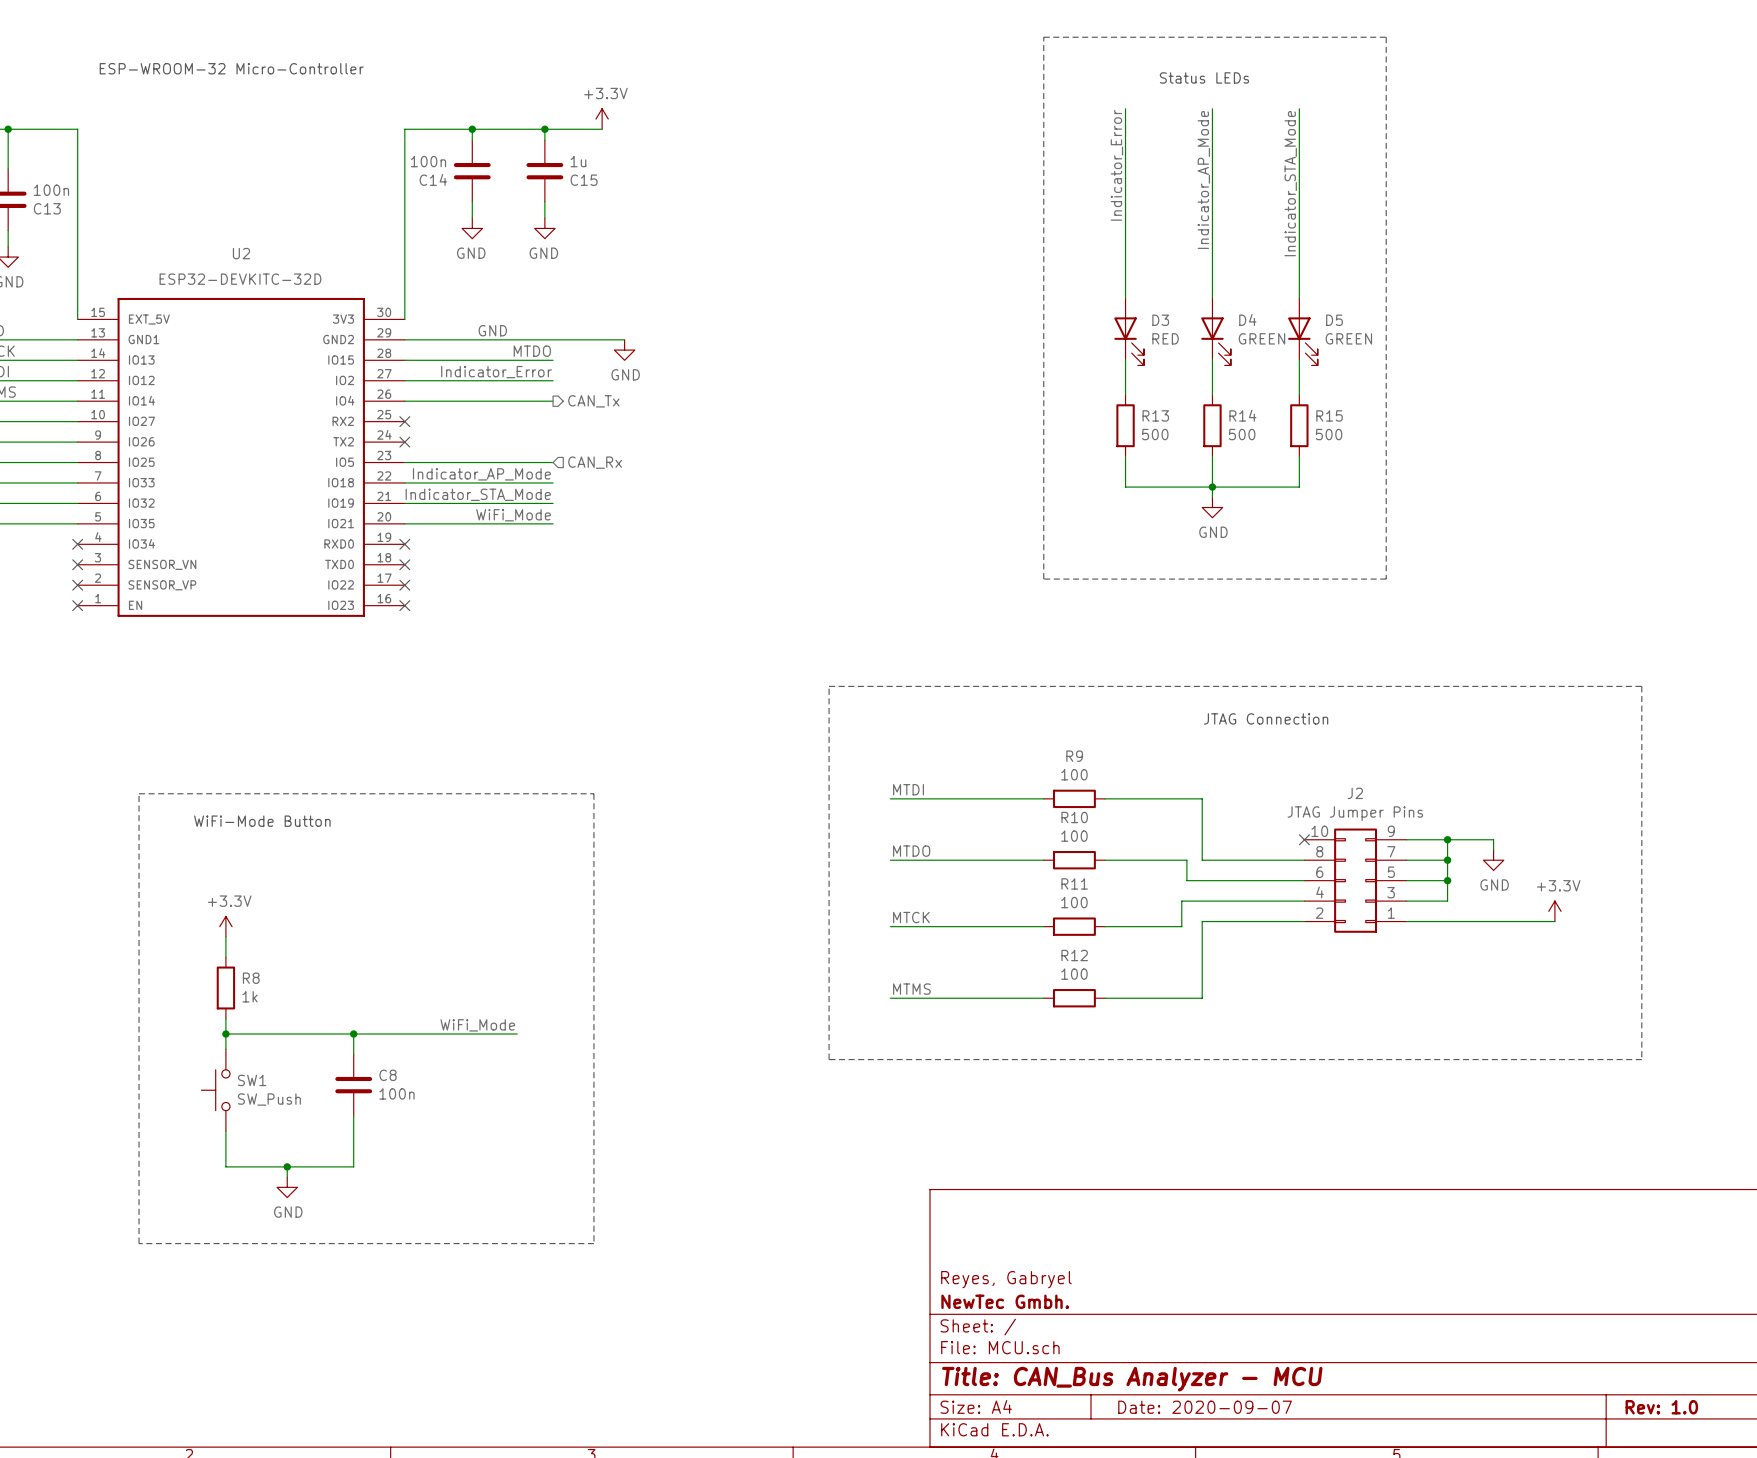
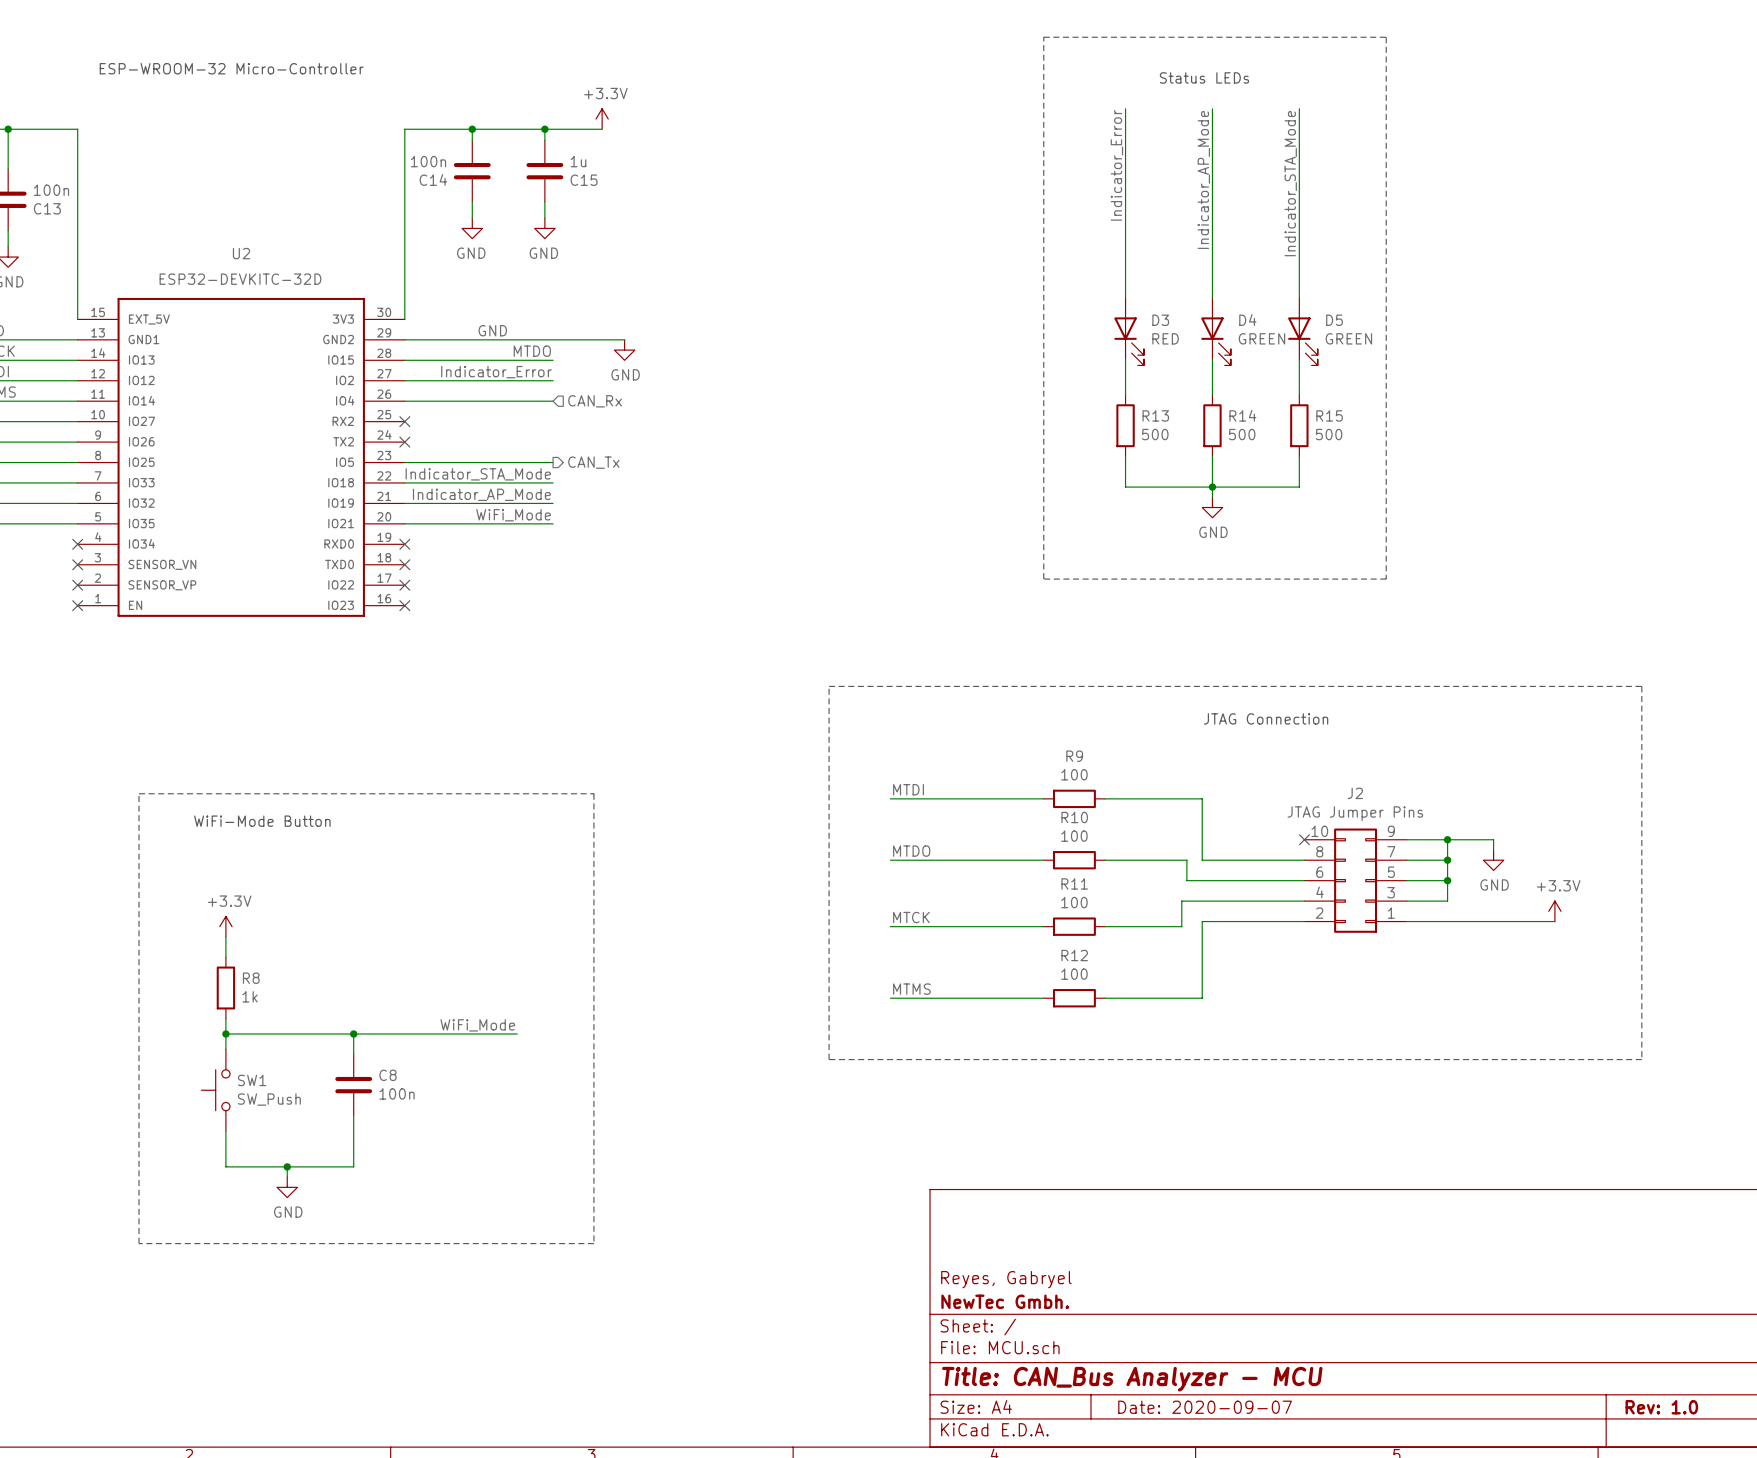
hierarchical label shape: output (593, 401) -> input (595, 401)
hierarchical label: CAN_Tx (593, 401) -> CAN_Rx (595, 401)
hierarchical label shape: input (595, 462) -> output (593, 462)
hierarchical label: CAN_Rx (595, 462) -> CAN_Tx (593, 462)
label: Indicator_AP_Mode (481, 474) -> Indicator_STA_Mode (478, 474)
label: Indicator_STA_Mode (478, 494) -> Indicator_AP_Mode (481, 494)

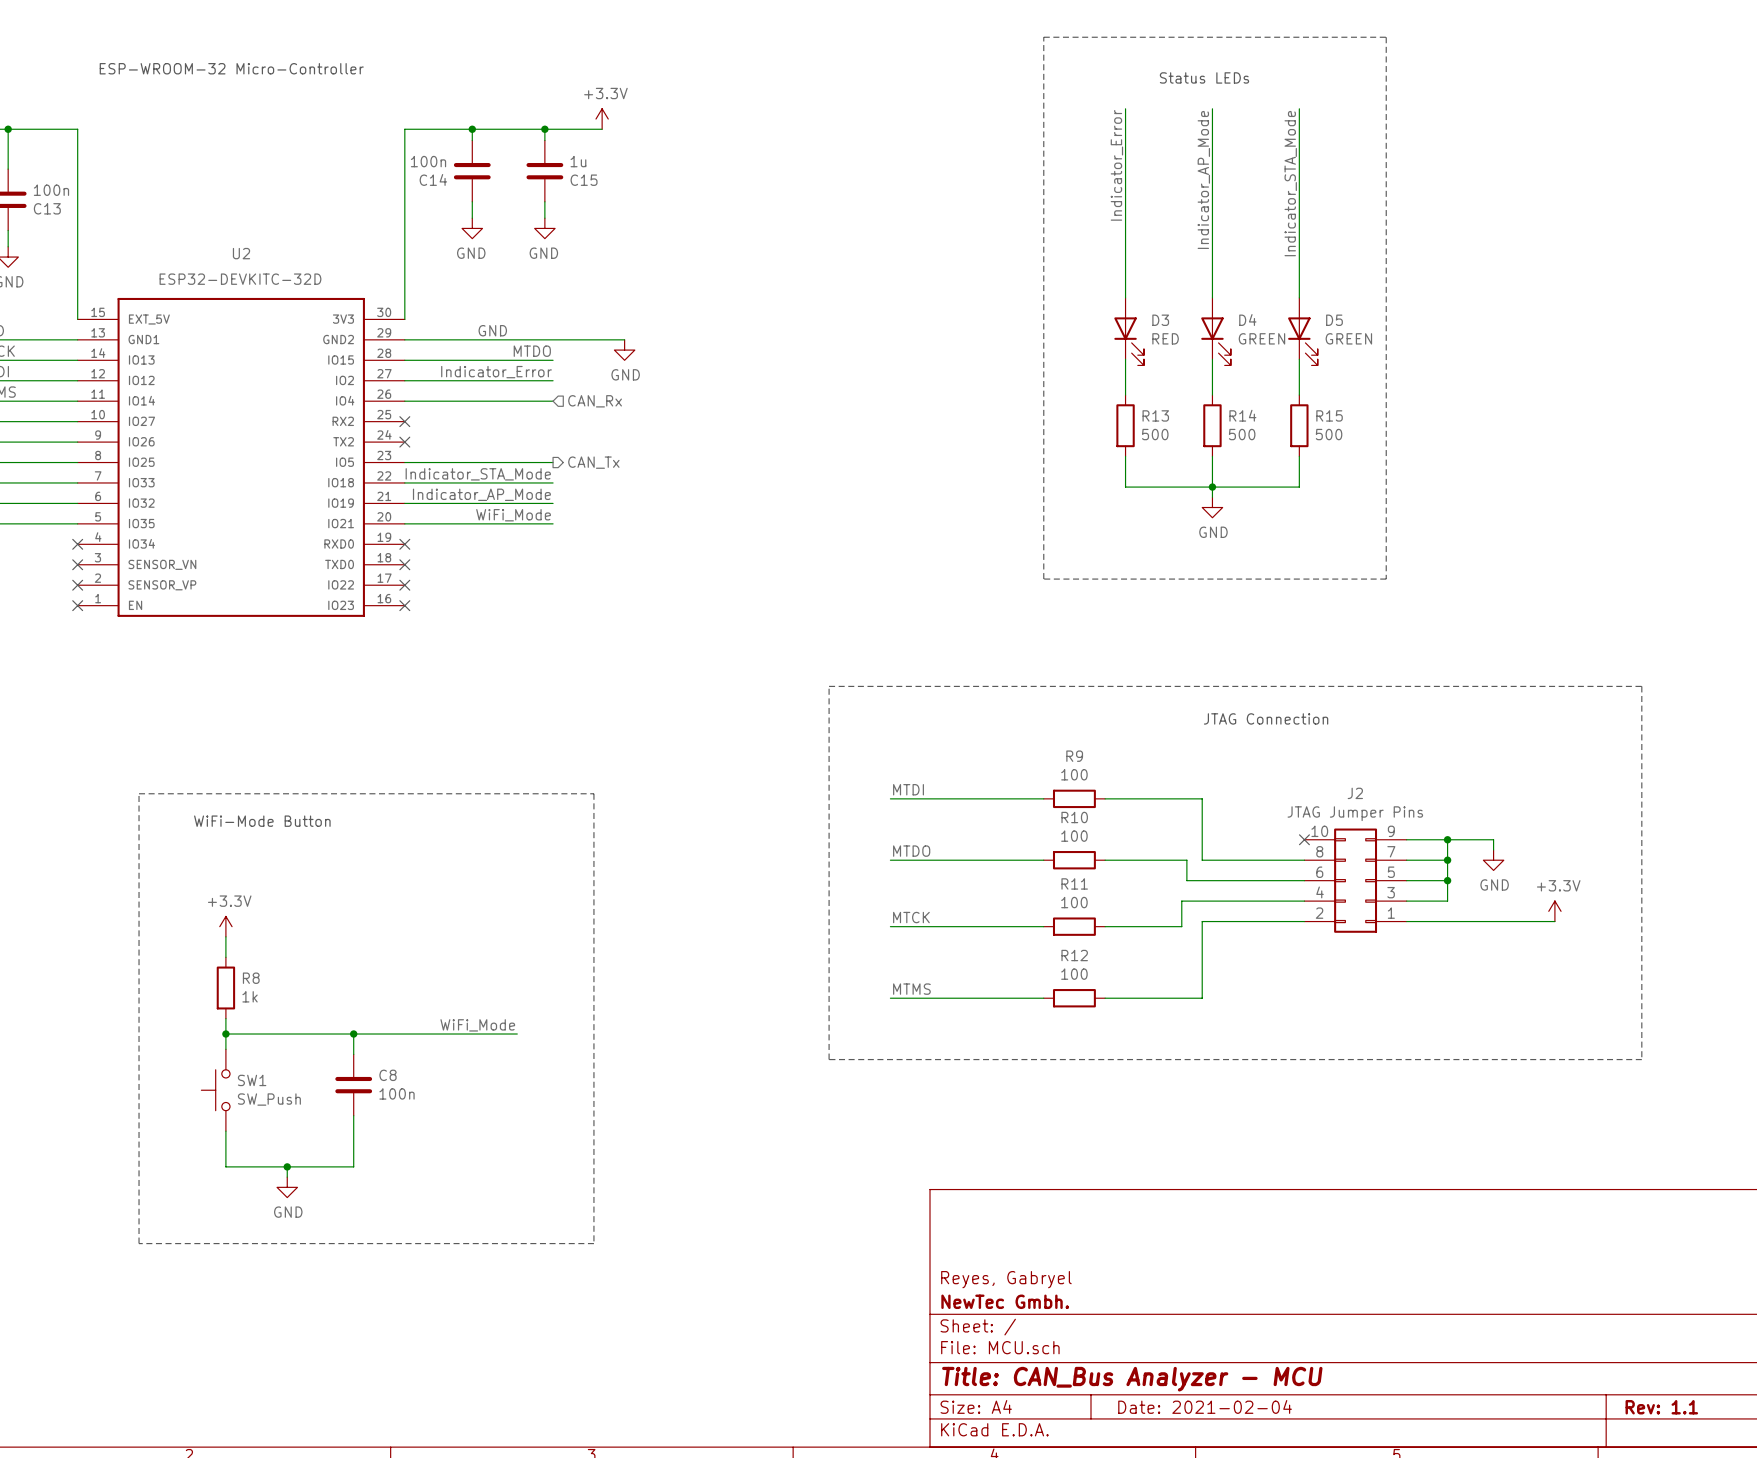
title block: Date: 2020-09-07 (1205, 1407) -> Date: 2021-02-04 (1205, 1406)
title block: Rev: 1.0 (1661, 1407) -> Rev: 1.1 (1661, 1407)

